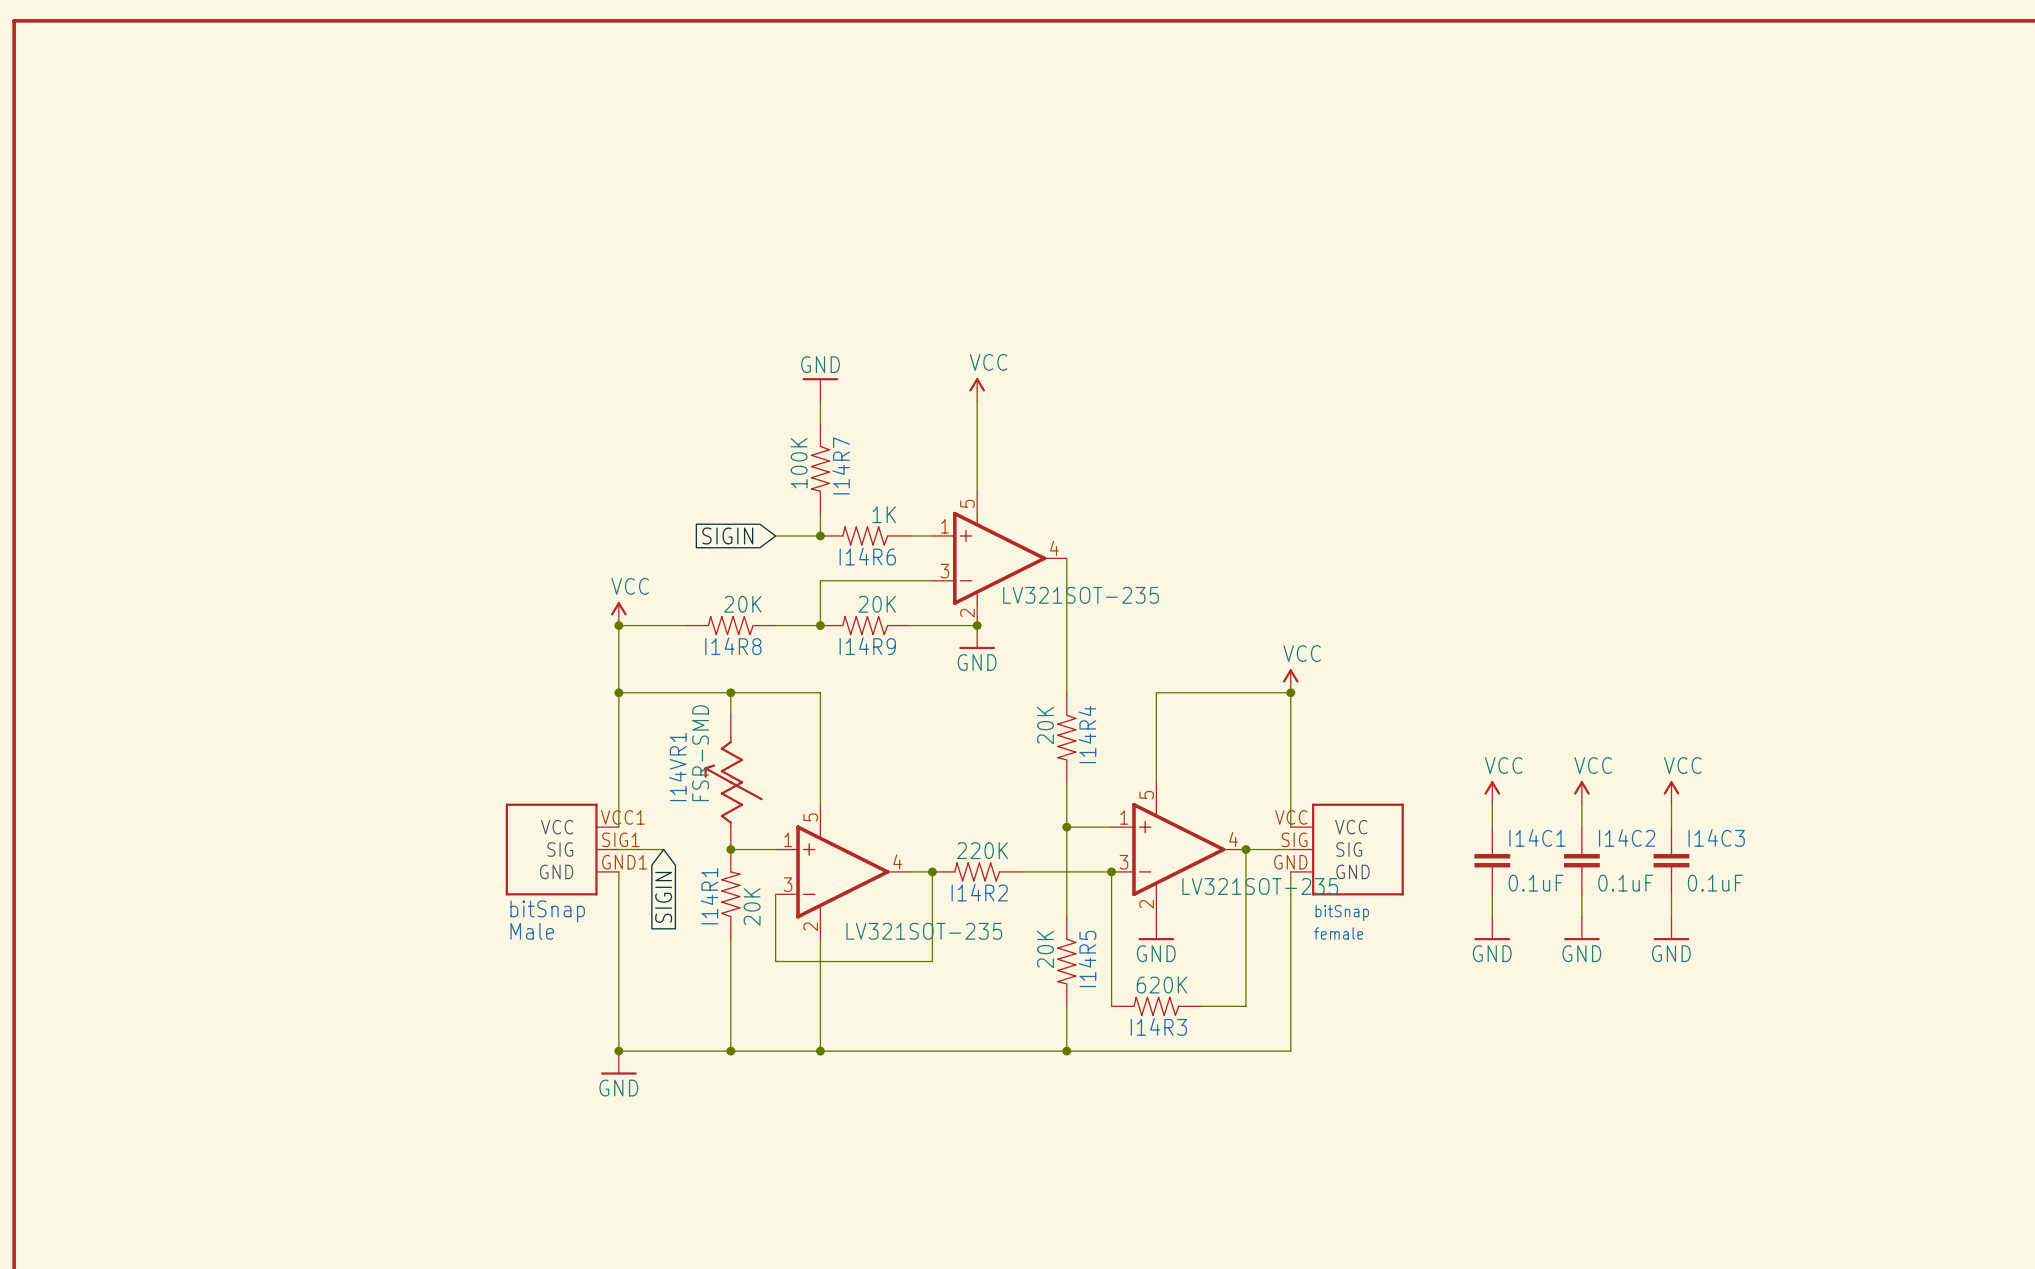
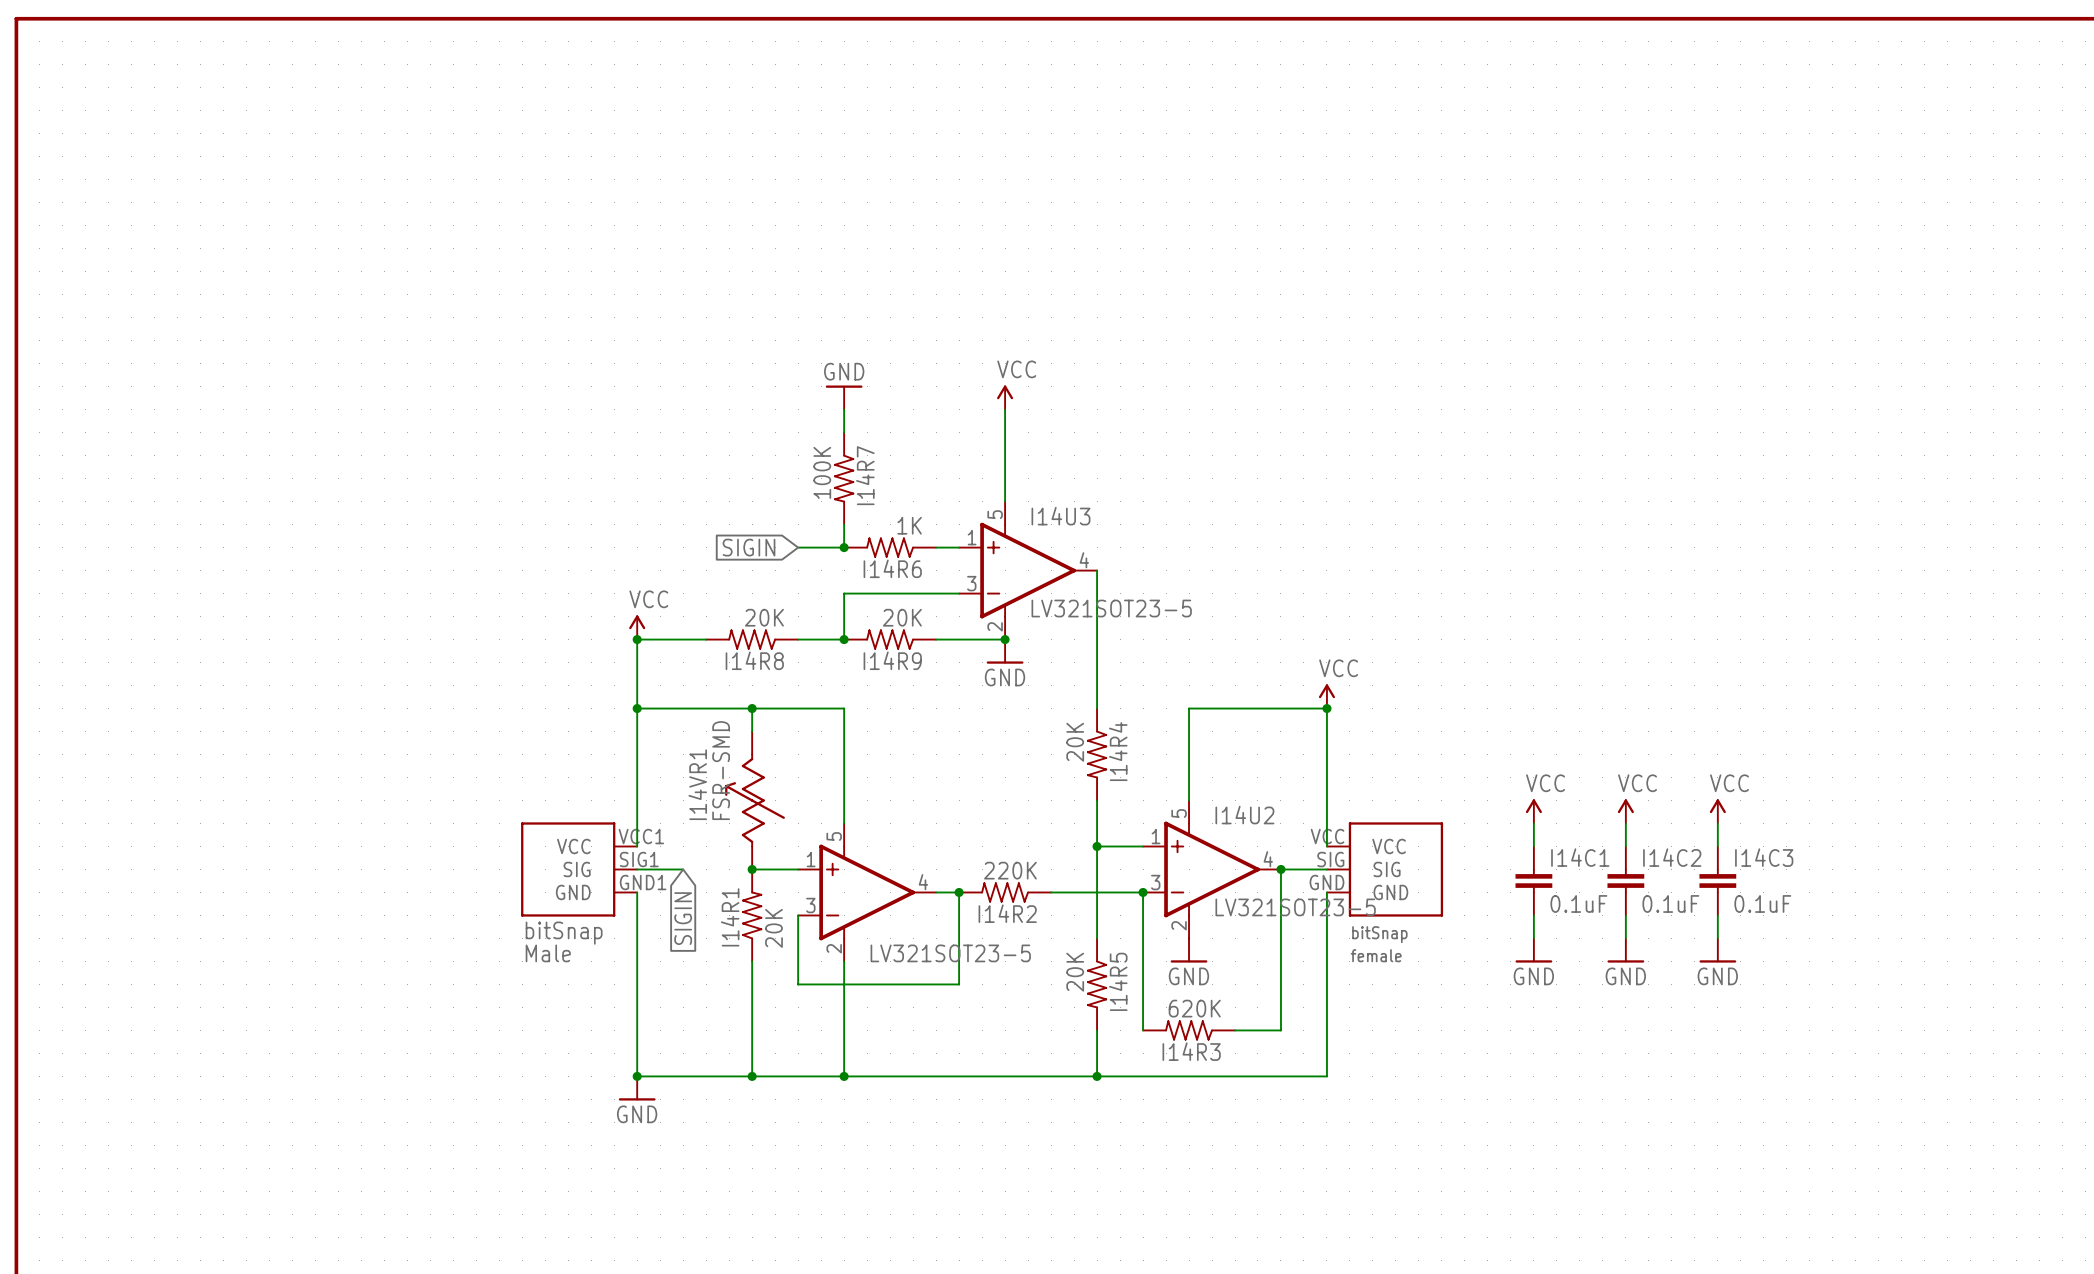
I14U3 name: none -> I14U3 (1060, 516)
I14U3 value: LV321SOT-235 (1081, 595) -> LV321SOT23-5 (1111, 608)
I14U2 name: none -> I14U2 (1244, 815)
I14U2 value: LV321SOT-235 (1260, 886) -> LV321SOT23-5 (1295, 907)
part value: LV321SOT-235 (924, 931) -> LV321SOT23-5 (950, 953)

